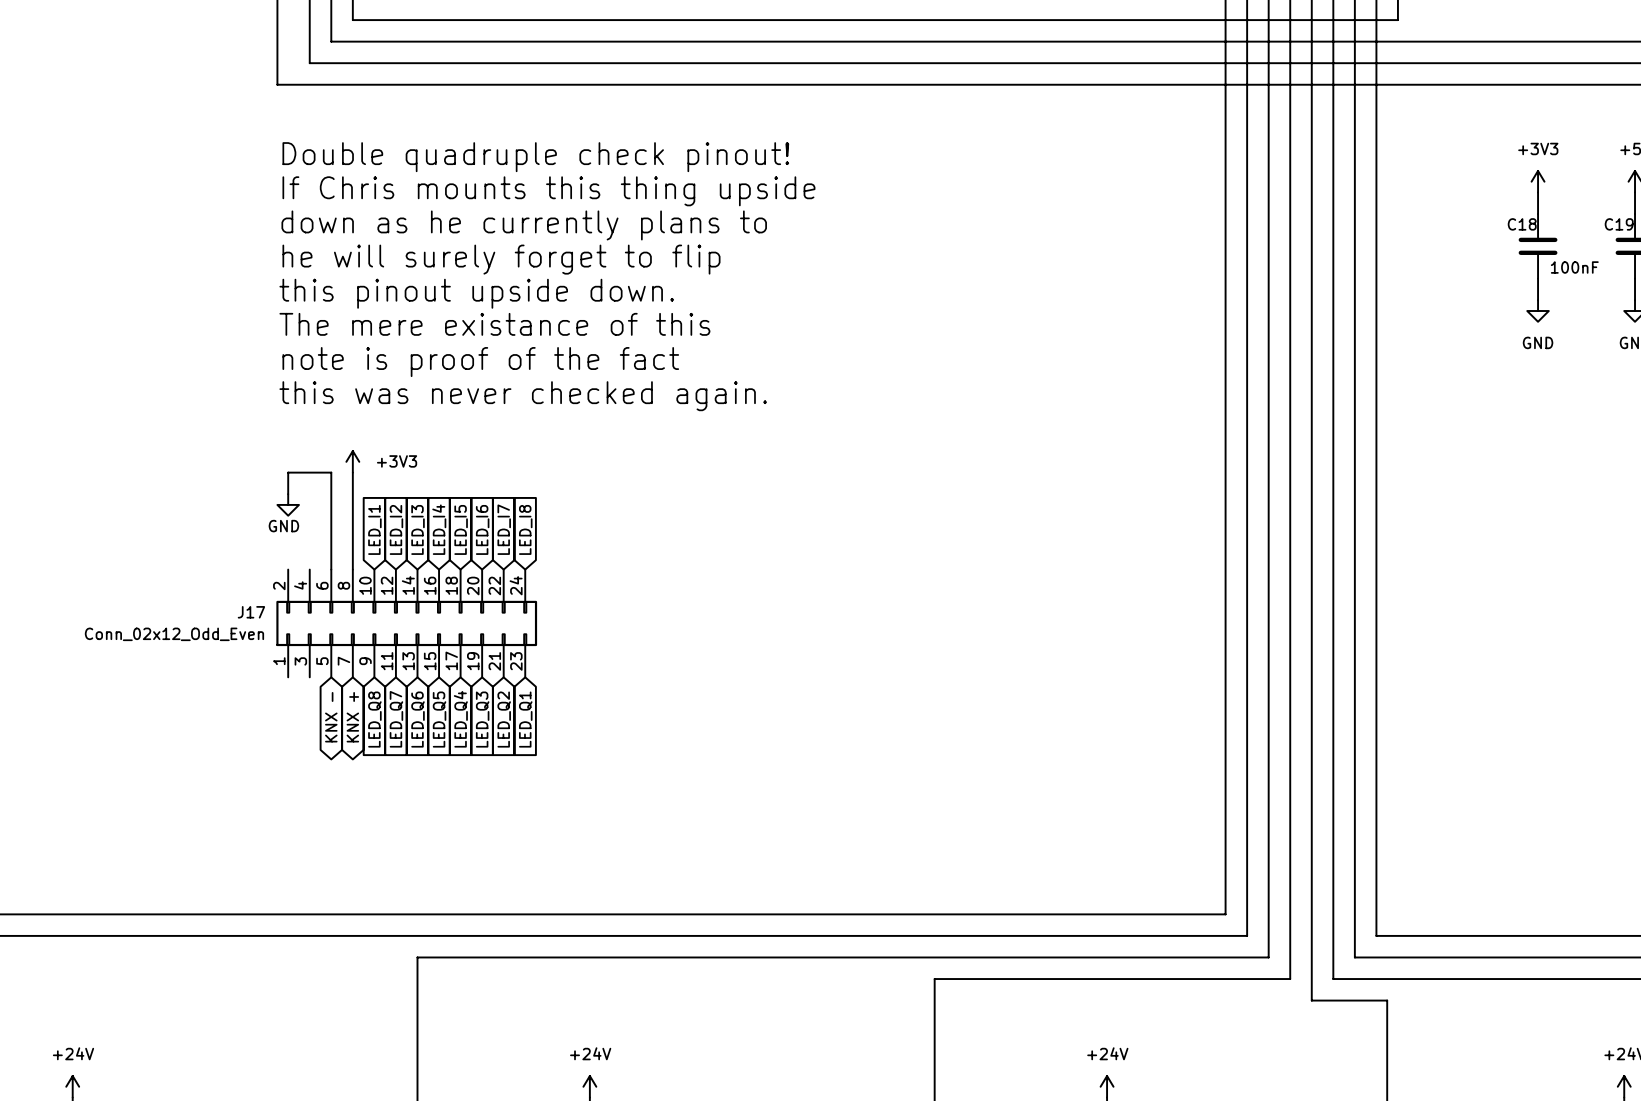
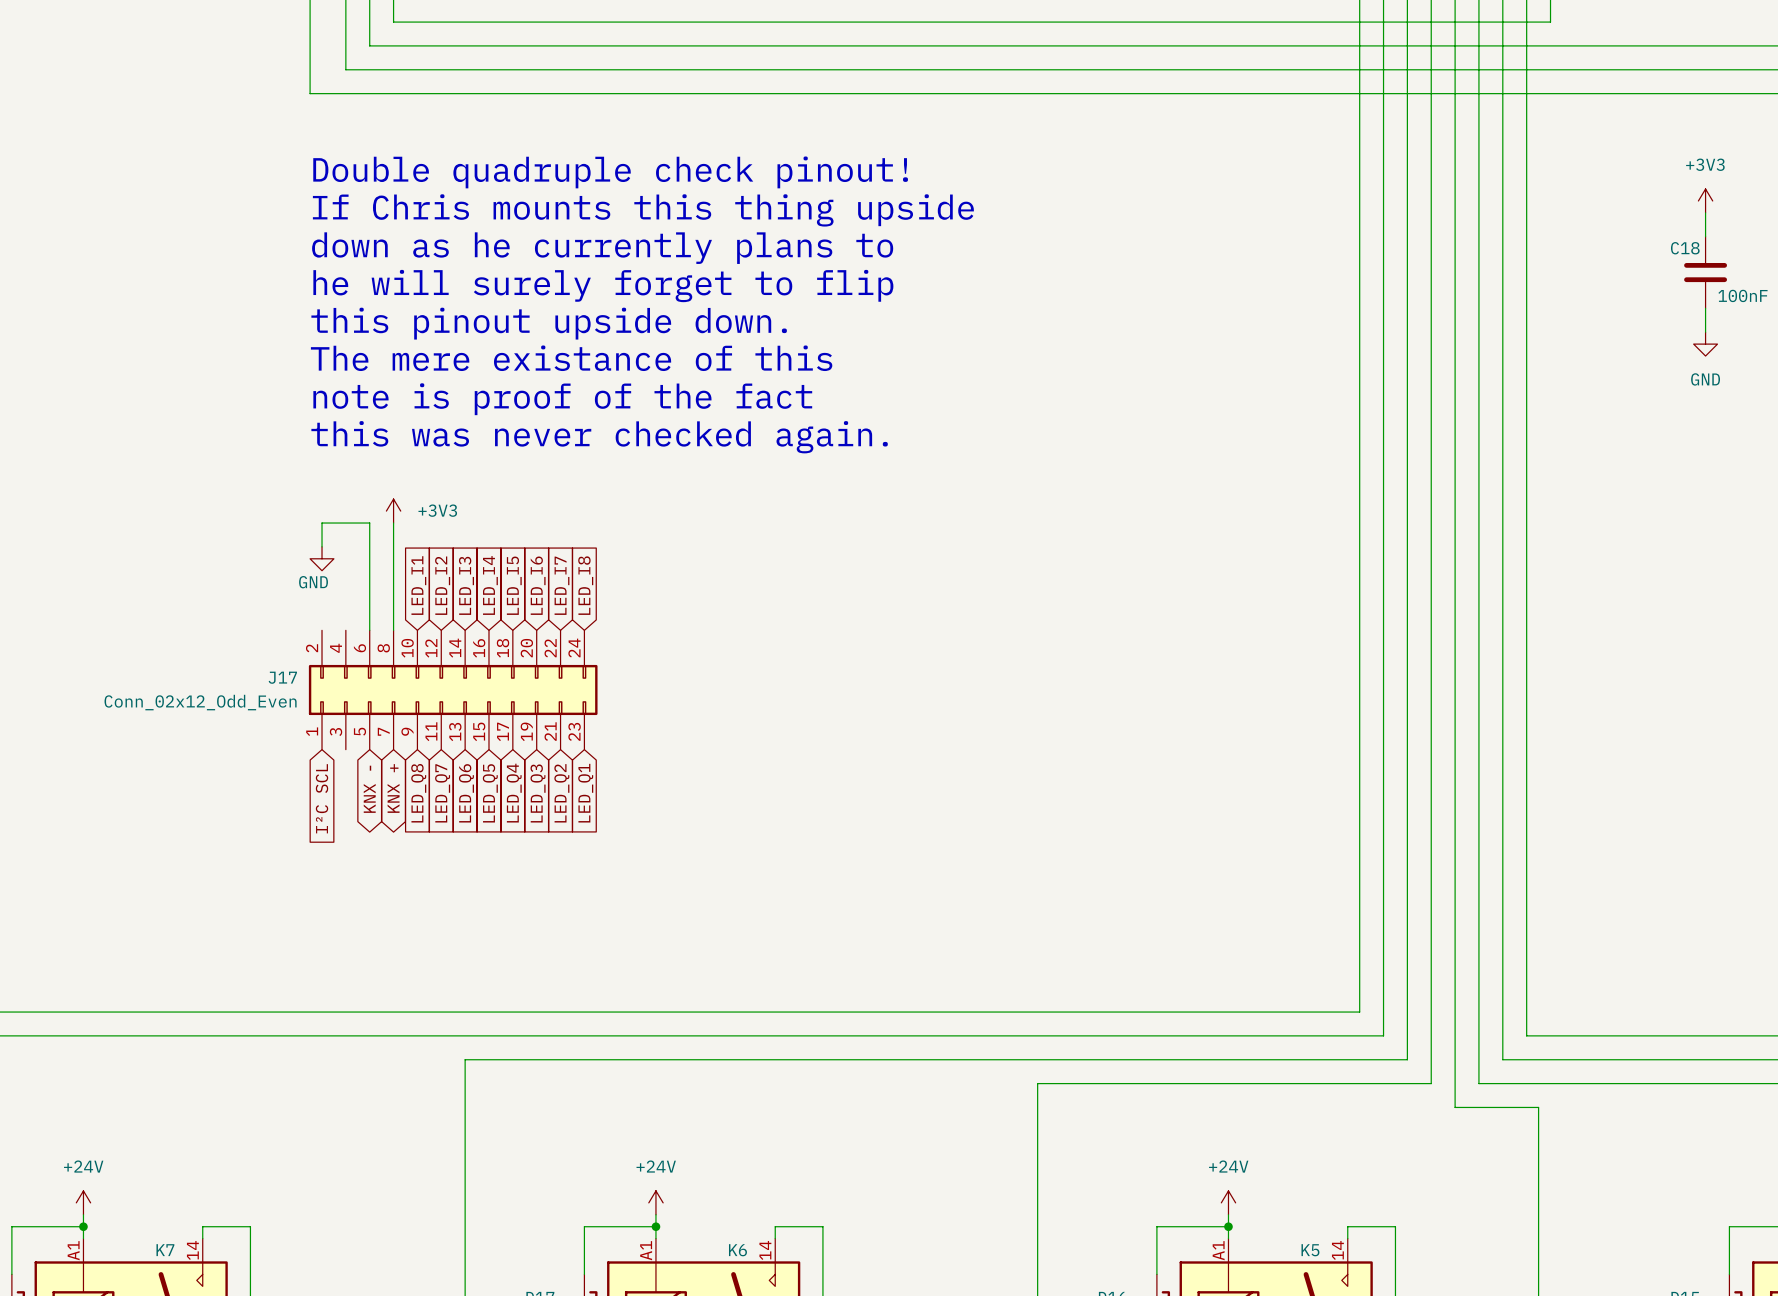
global label: none -> I²C SCL (322, 798)

